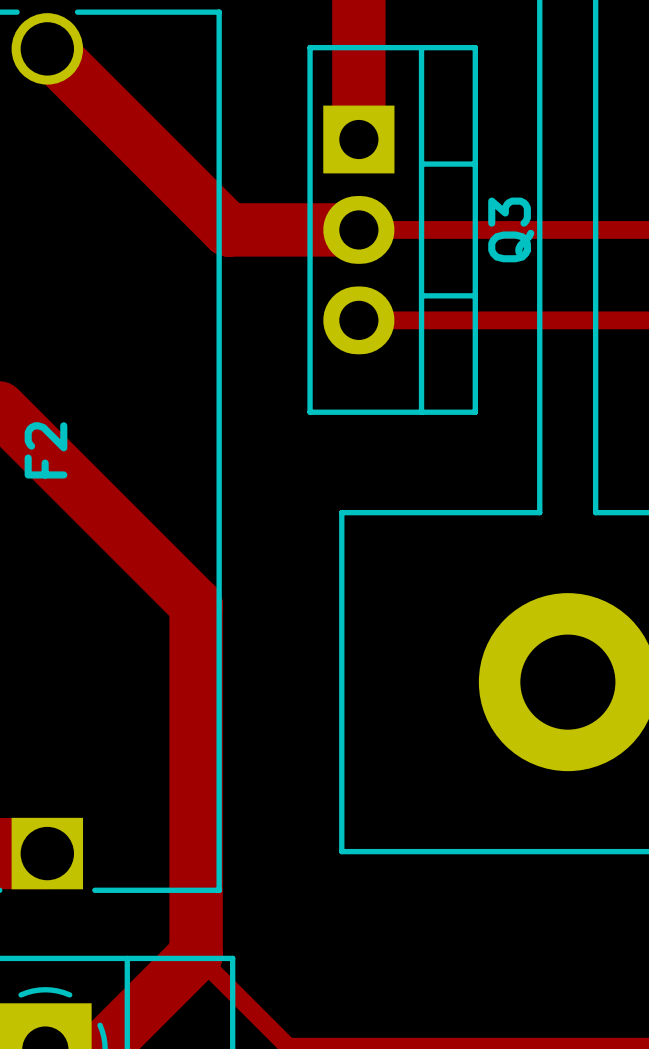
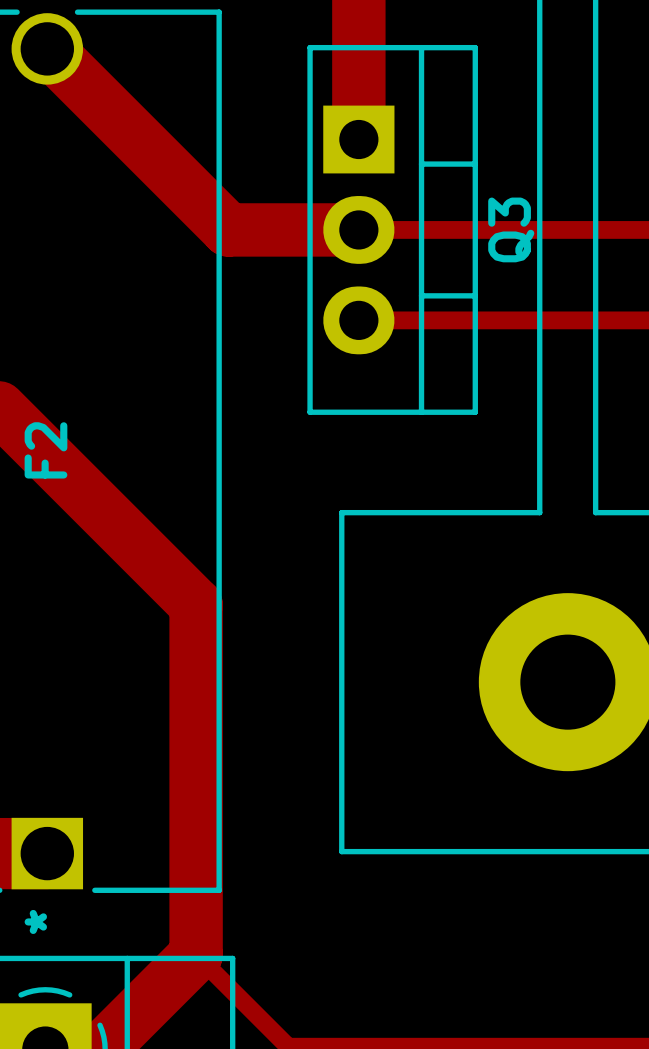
F2 text: none -> * (35, 921)

